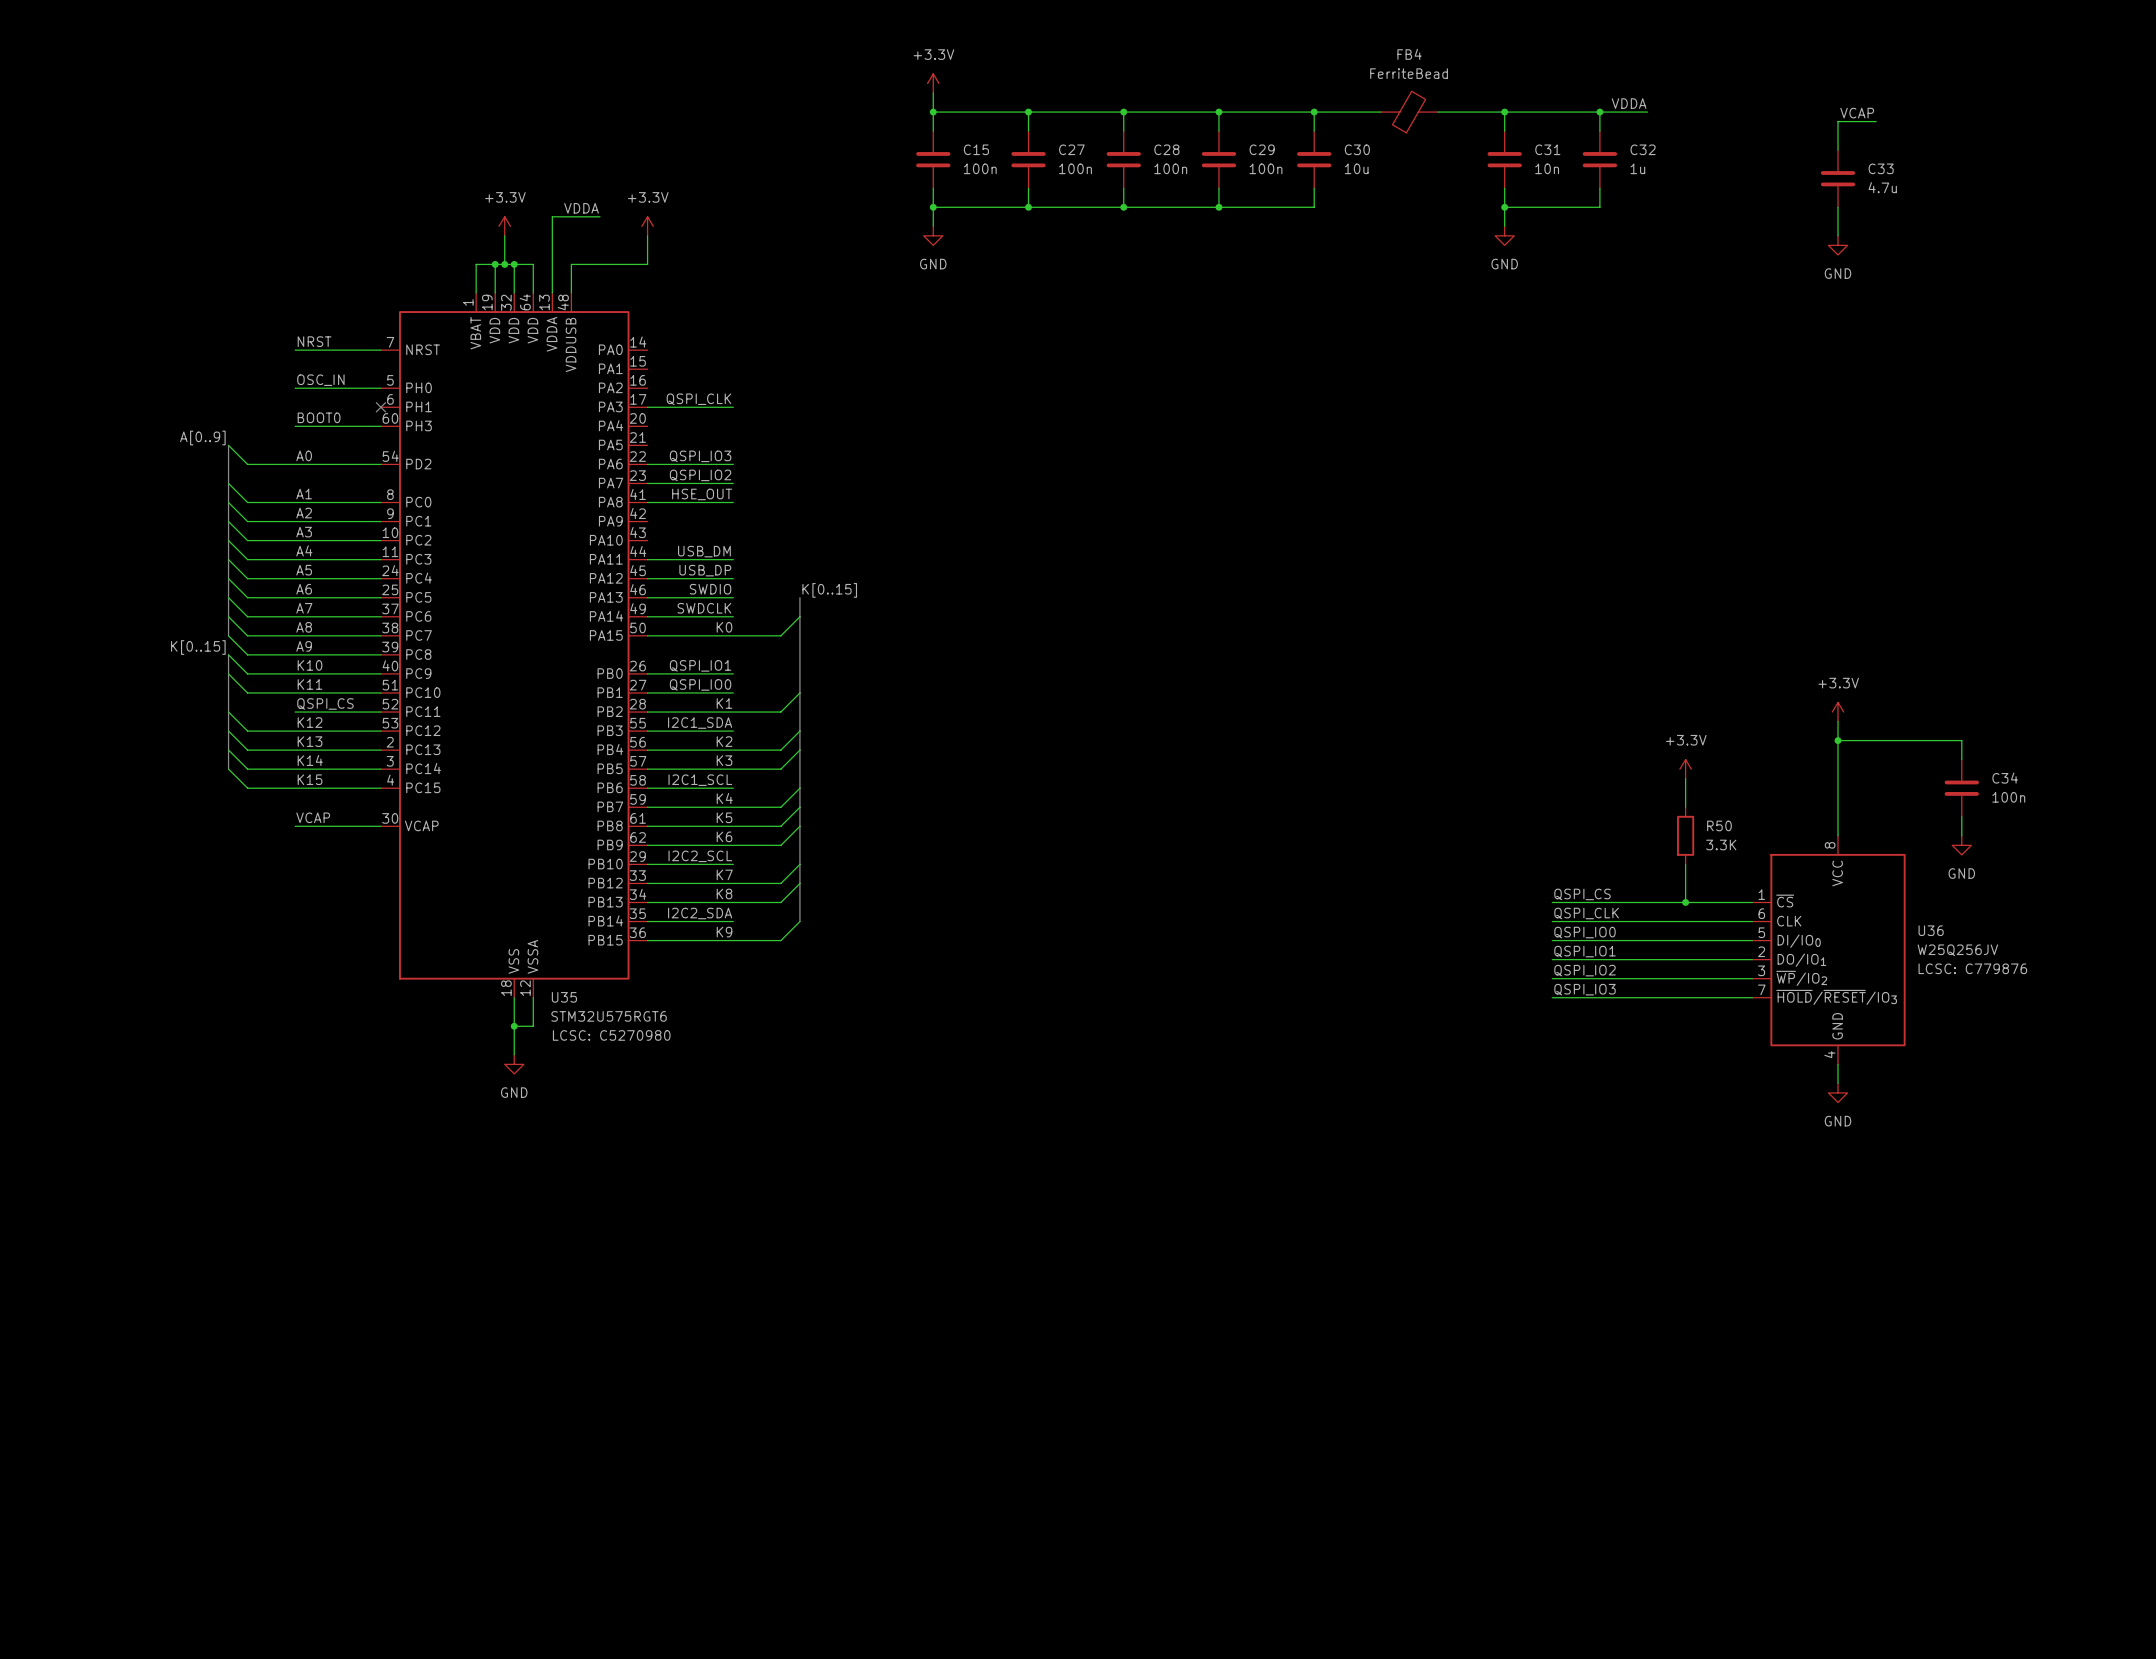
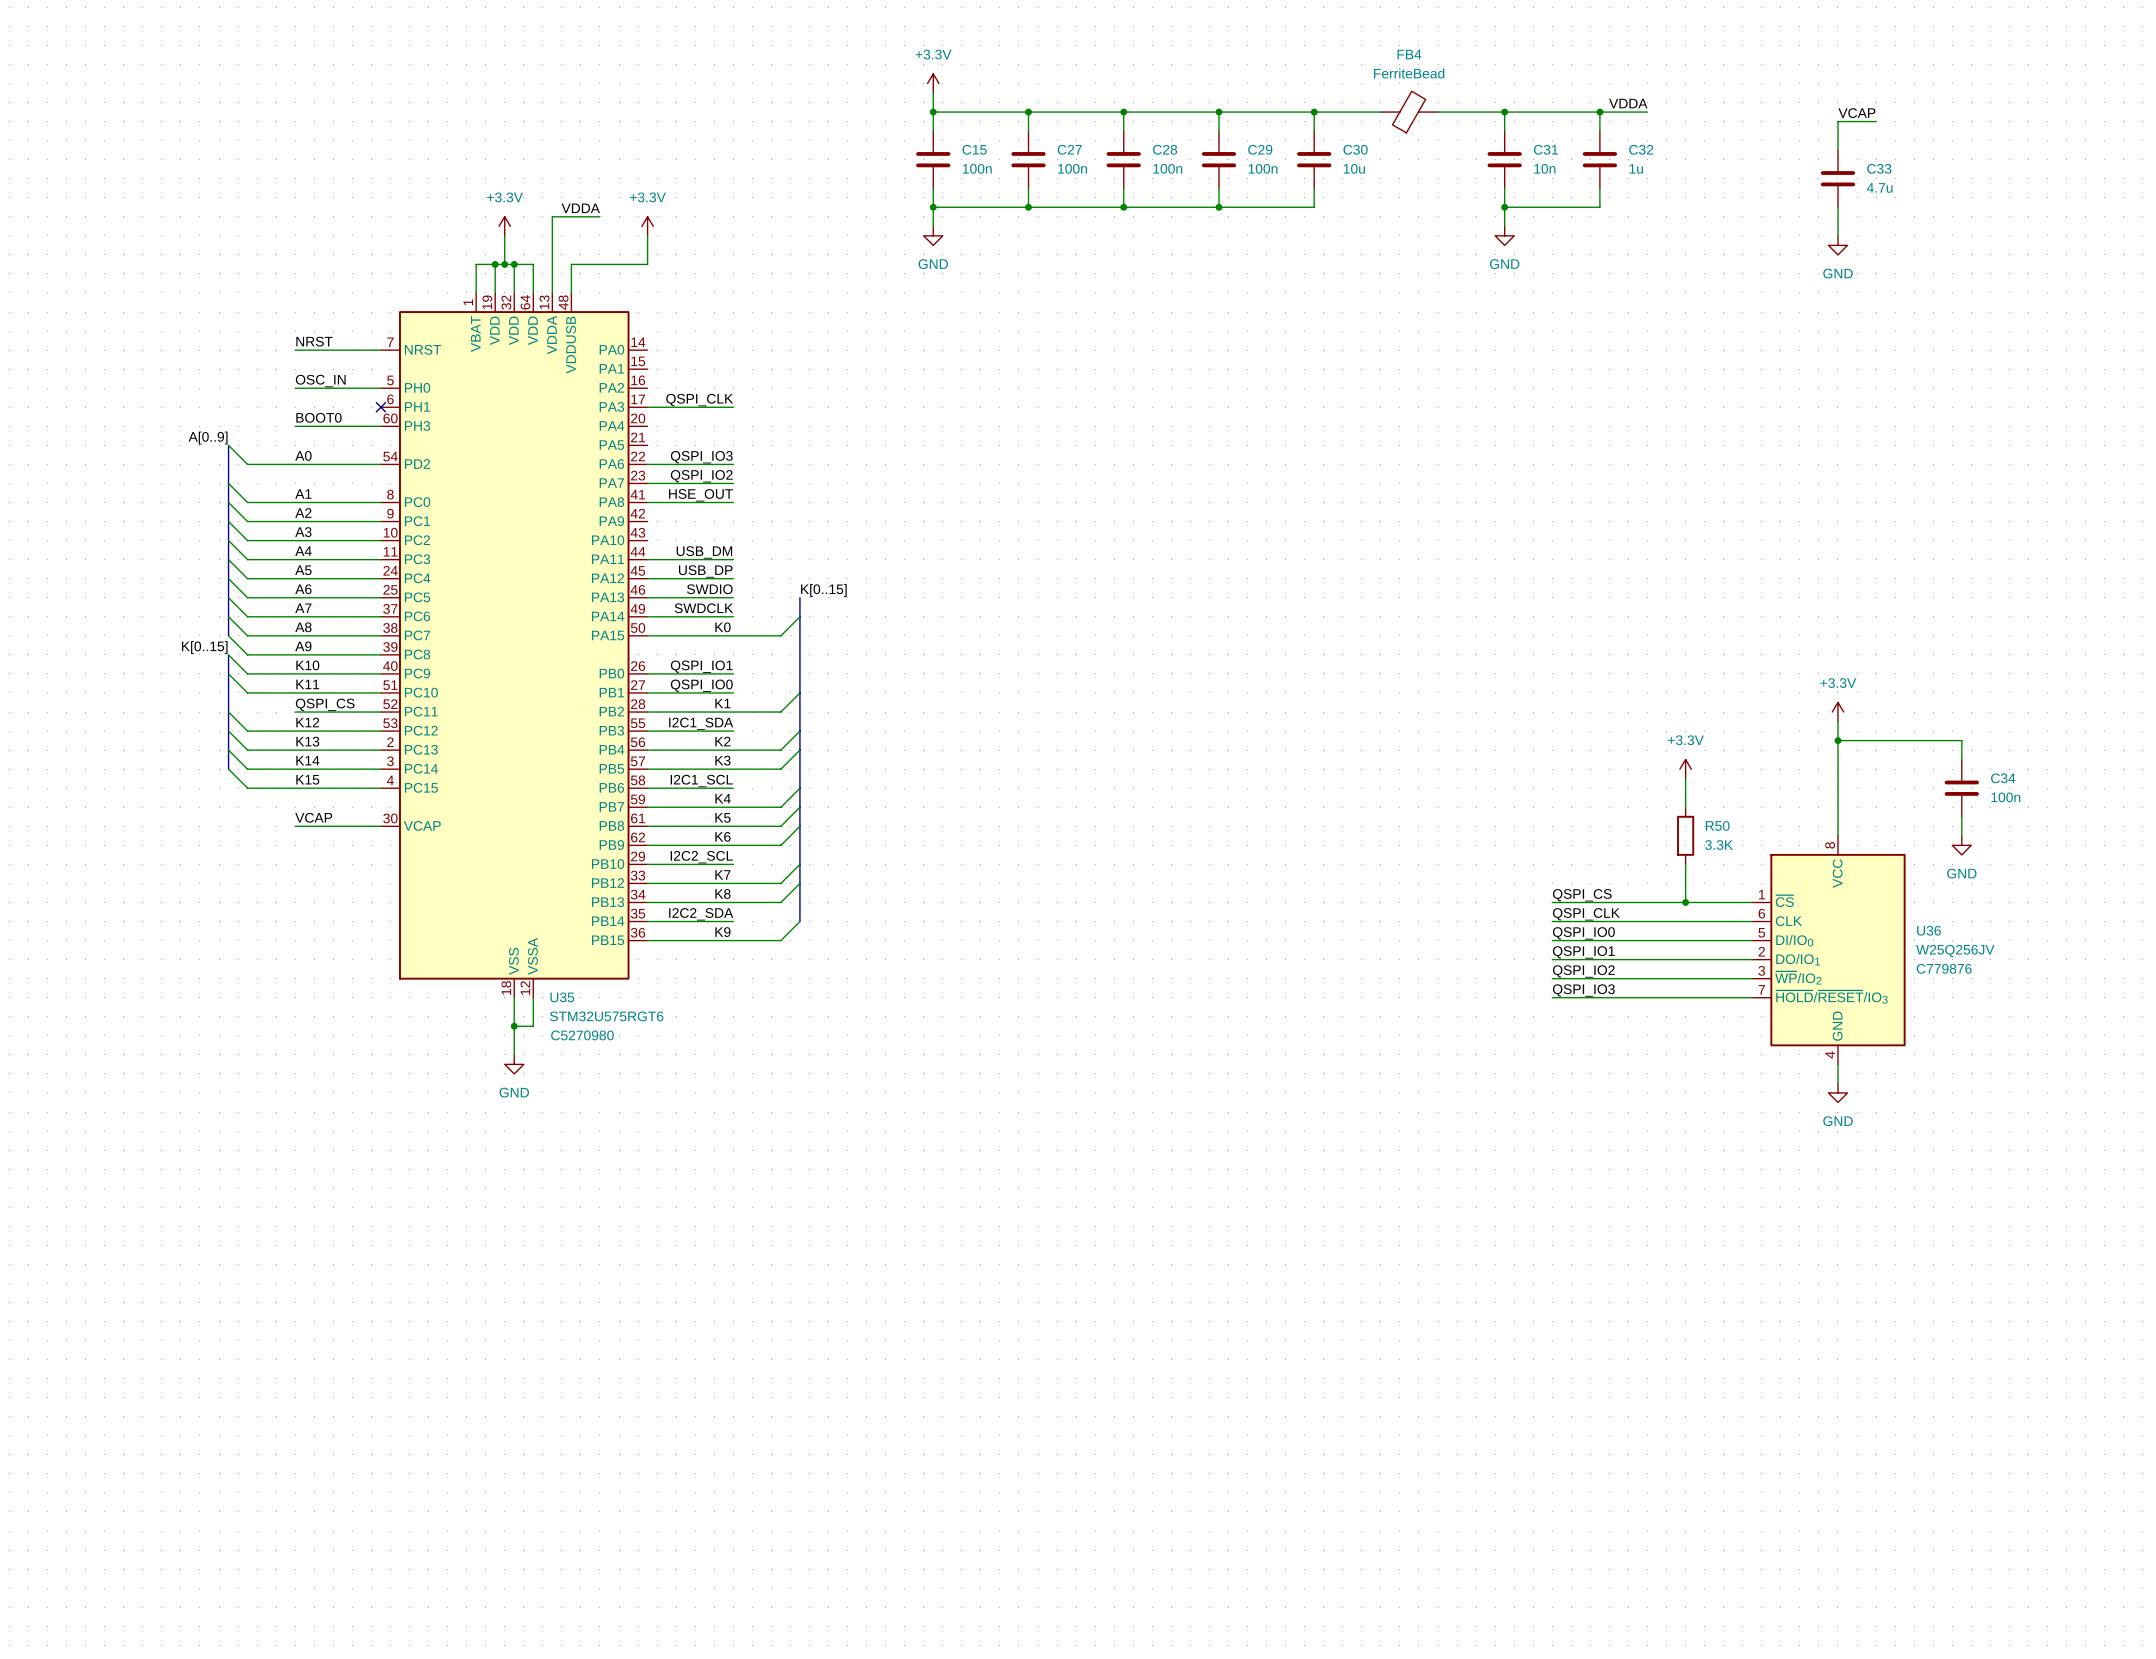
U36 text: LCSC: C779876 (1972, 968) -> C779876 (1944, 968)
U35 text: LCSC: C5270980 (611, 1035) -> C5270980 (582, 1035)

